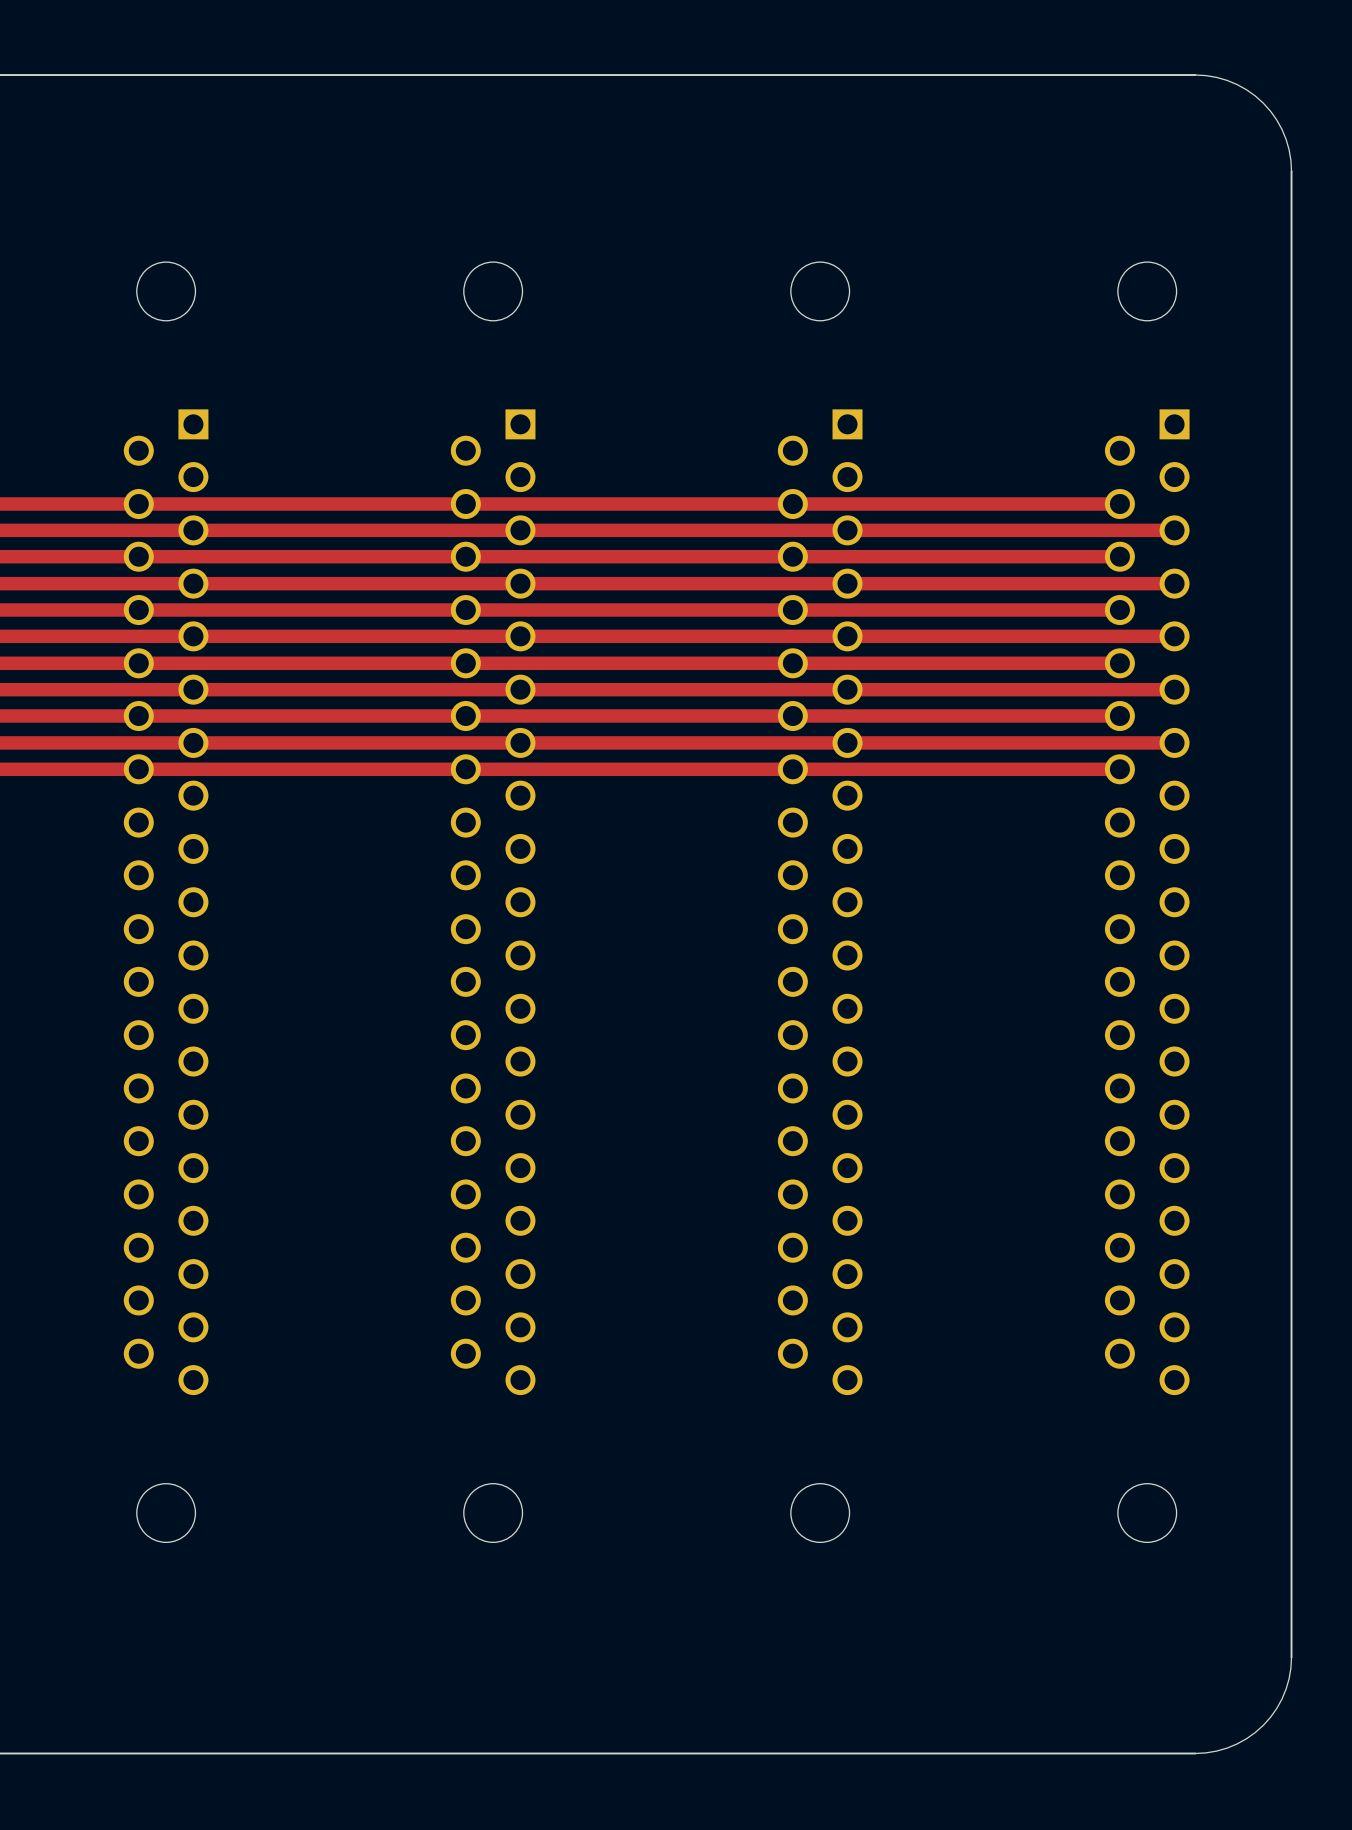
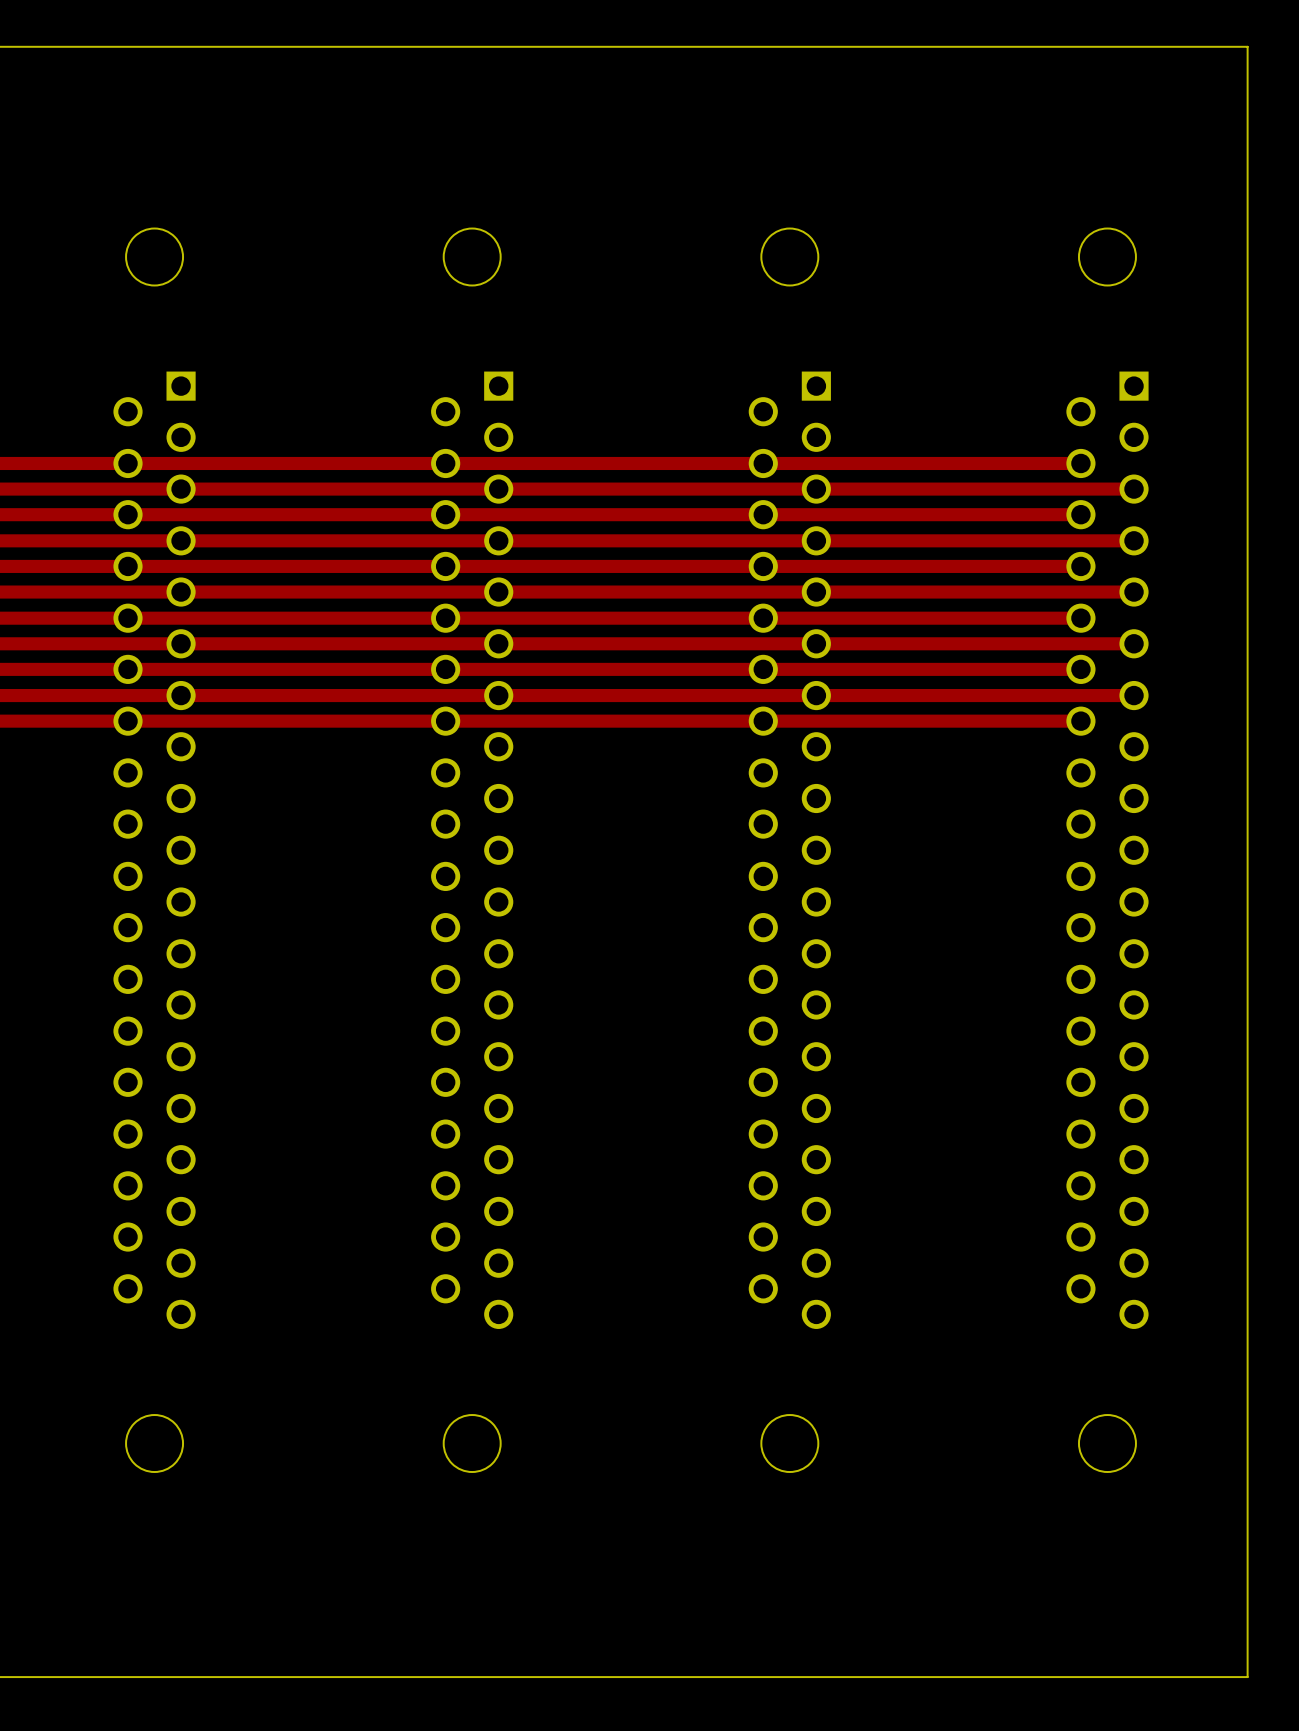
board edge: (1195, 75) (1216, 77) (1237, 84) (1263, 103) (1276, 120) (1286, 139) (1291, 171) -> (1154, 46) (1247, 46) (1247, 140)
board edge: (1291, 1657) (1286, 1689) (1276, 1708) (1263, 1725) (1246, 1738) (1227, 1748) (1195, 1753) -> (1247, 1583) (1247, 1677) (1154, 1677)

